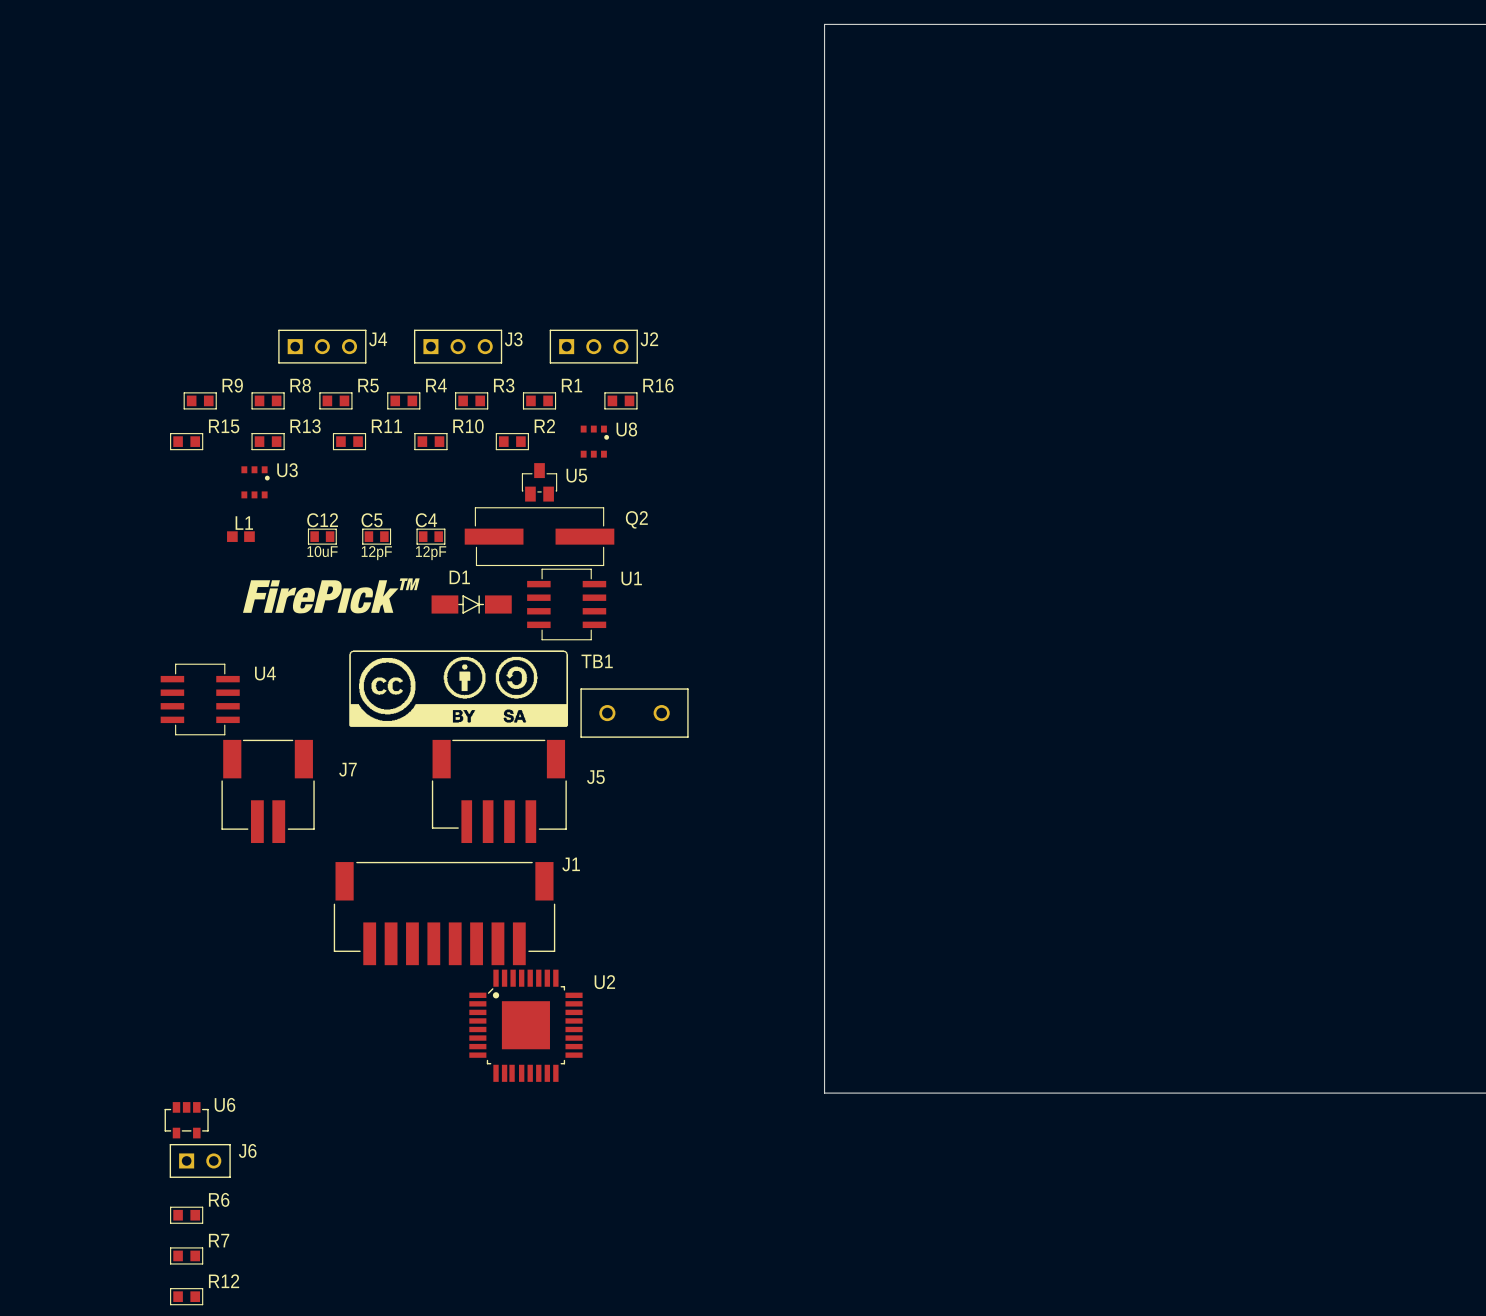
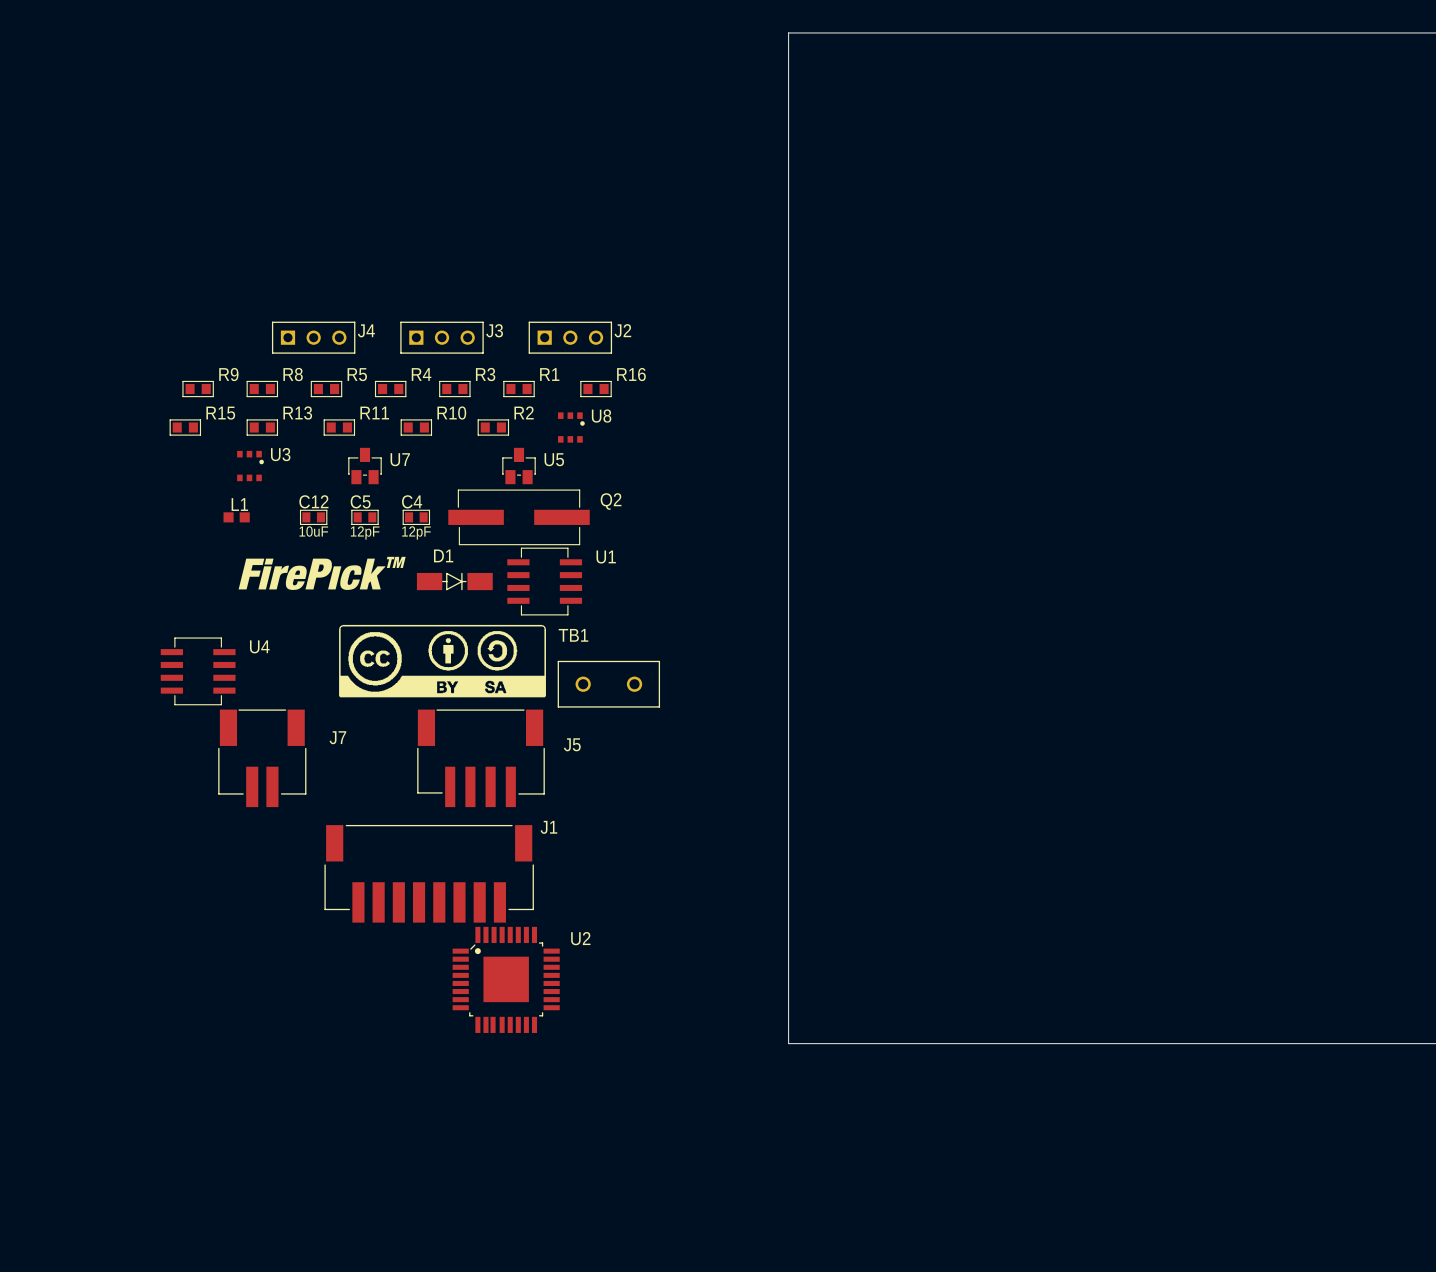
U7: none -> (365, 466)
U6: (186, 1120) -> none
J6: (200, 1160) -> none
R6: (186, 1215) -> none
R7: (186, 1255) -> none
R12: (186, 1296) -> none

